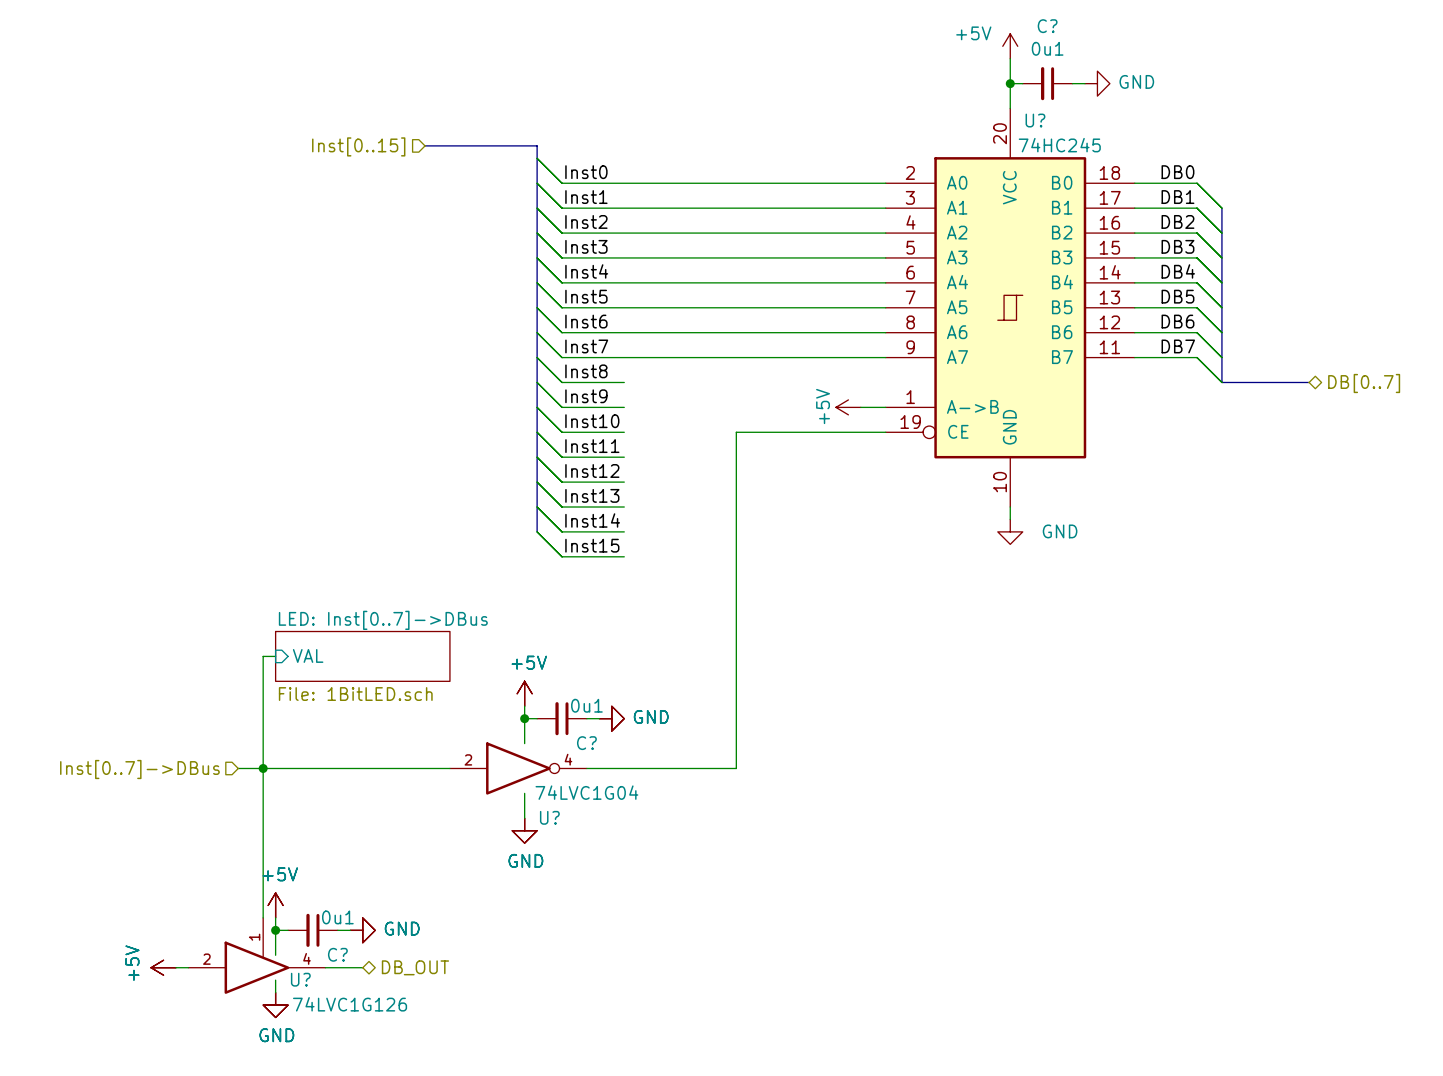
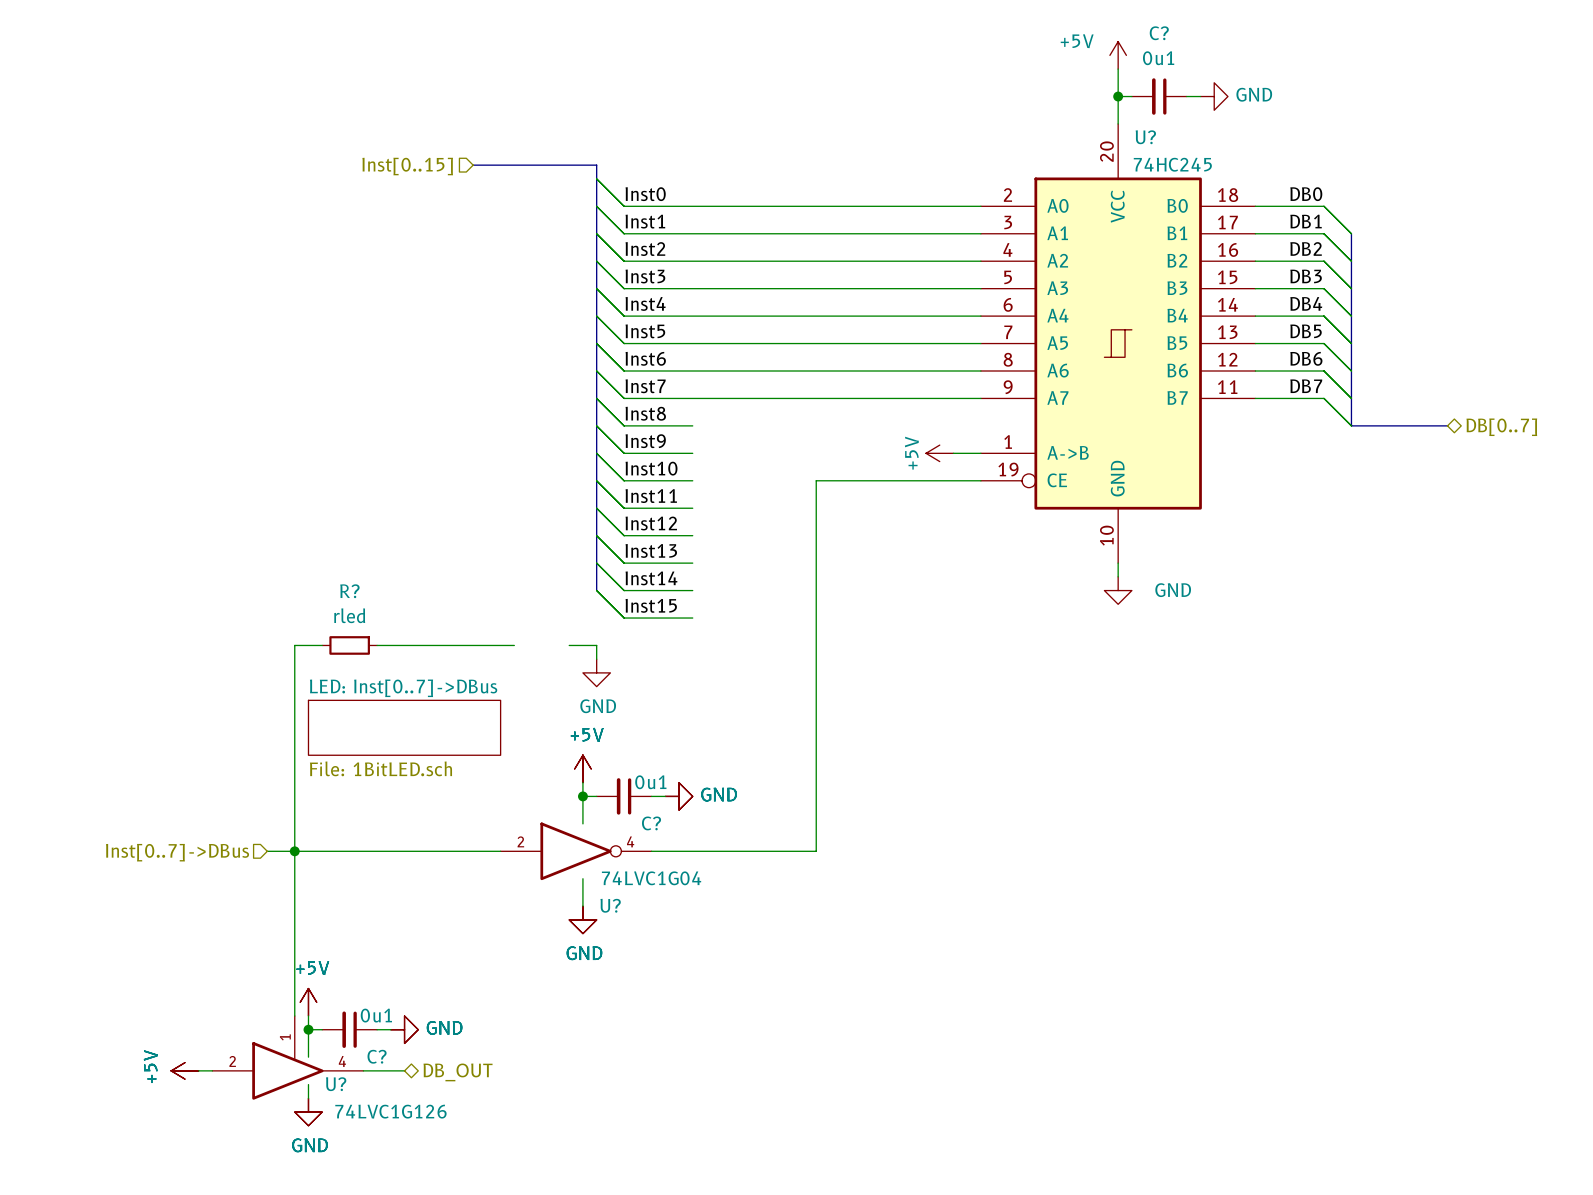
R?: none -> rled (349, 645)
wire: none -> (377, 645) (514, 645)
wire: none -> (569, 645) (596, 645) (596, 659)
power symbol: none -> GND (596, 672)
sheet pin: VAL (308, 655) -> none
wire: (263, 656) (275, 656) -> (294, 727) (294, 645) (322, 645)

